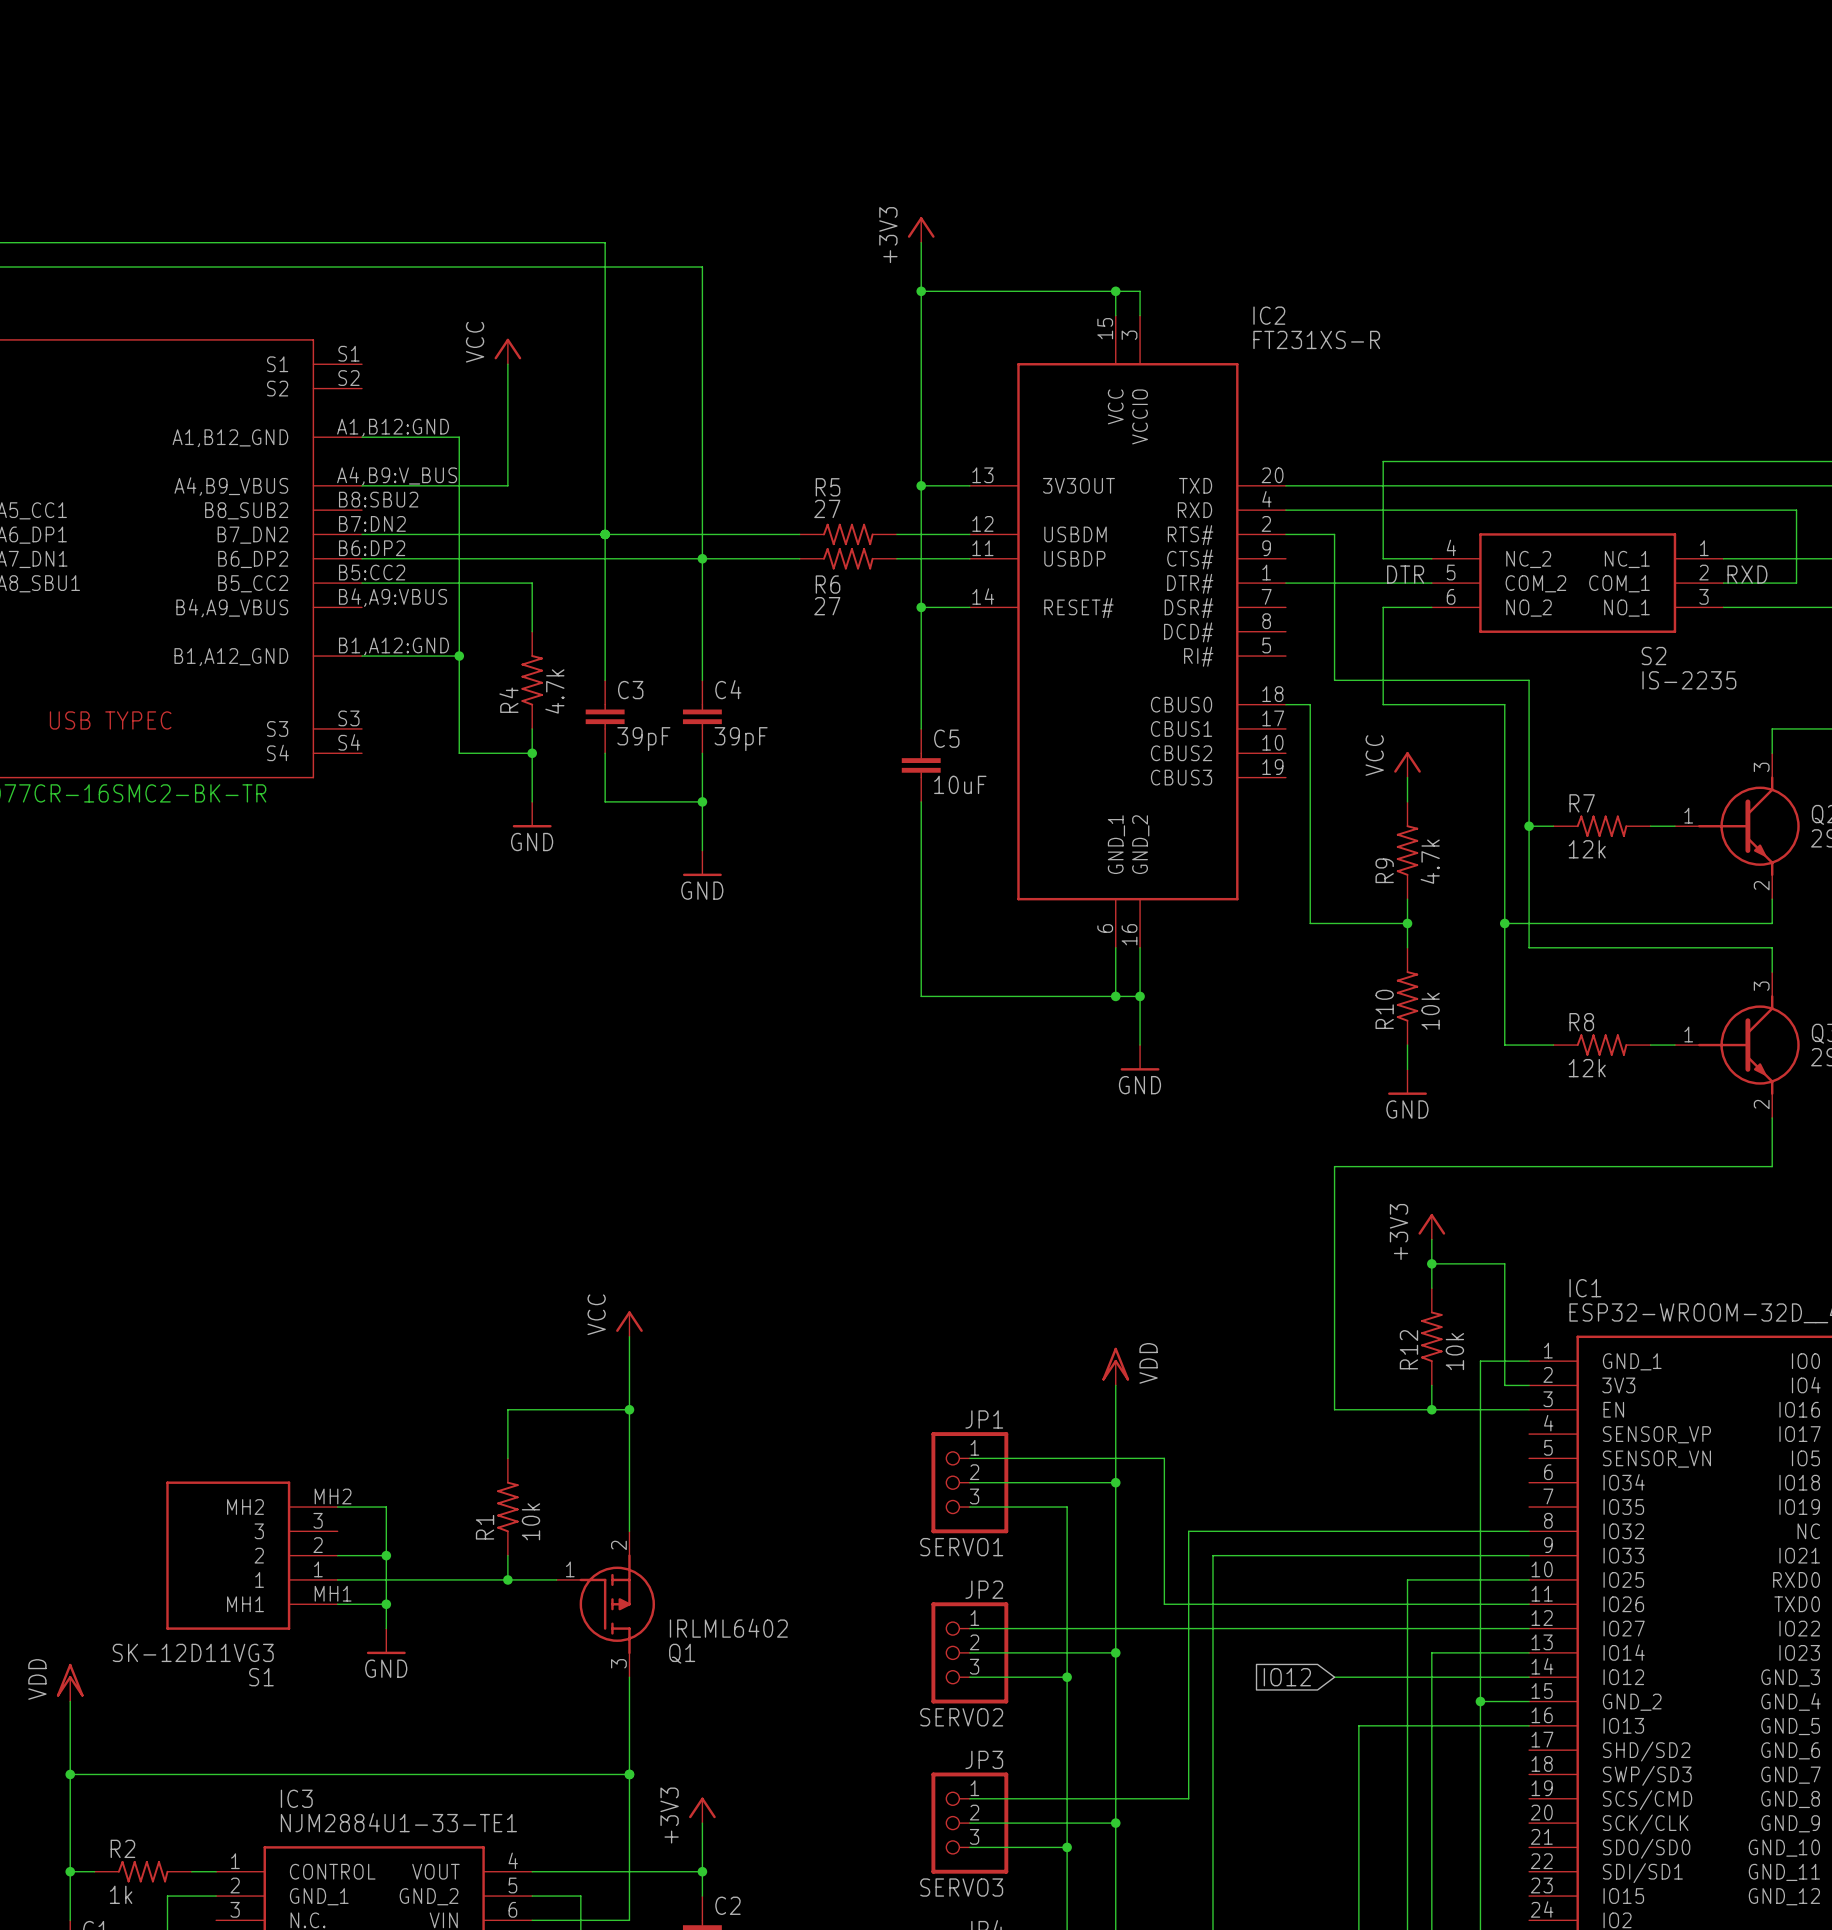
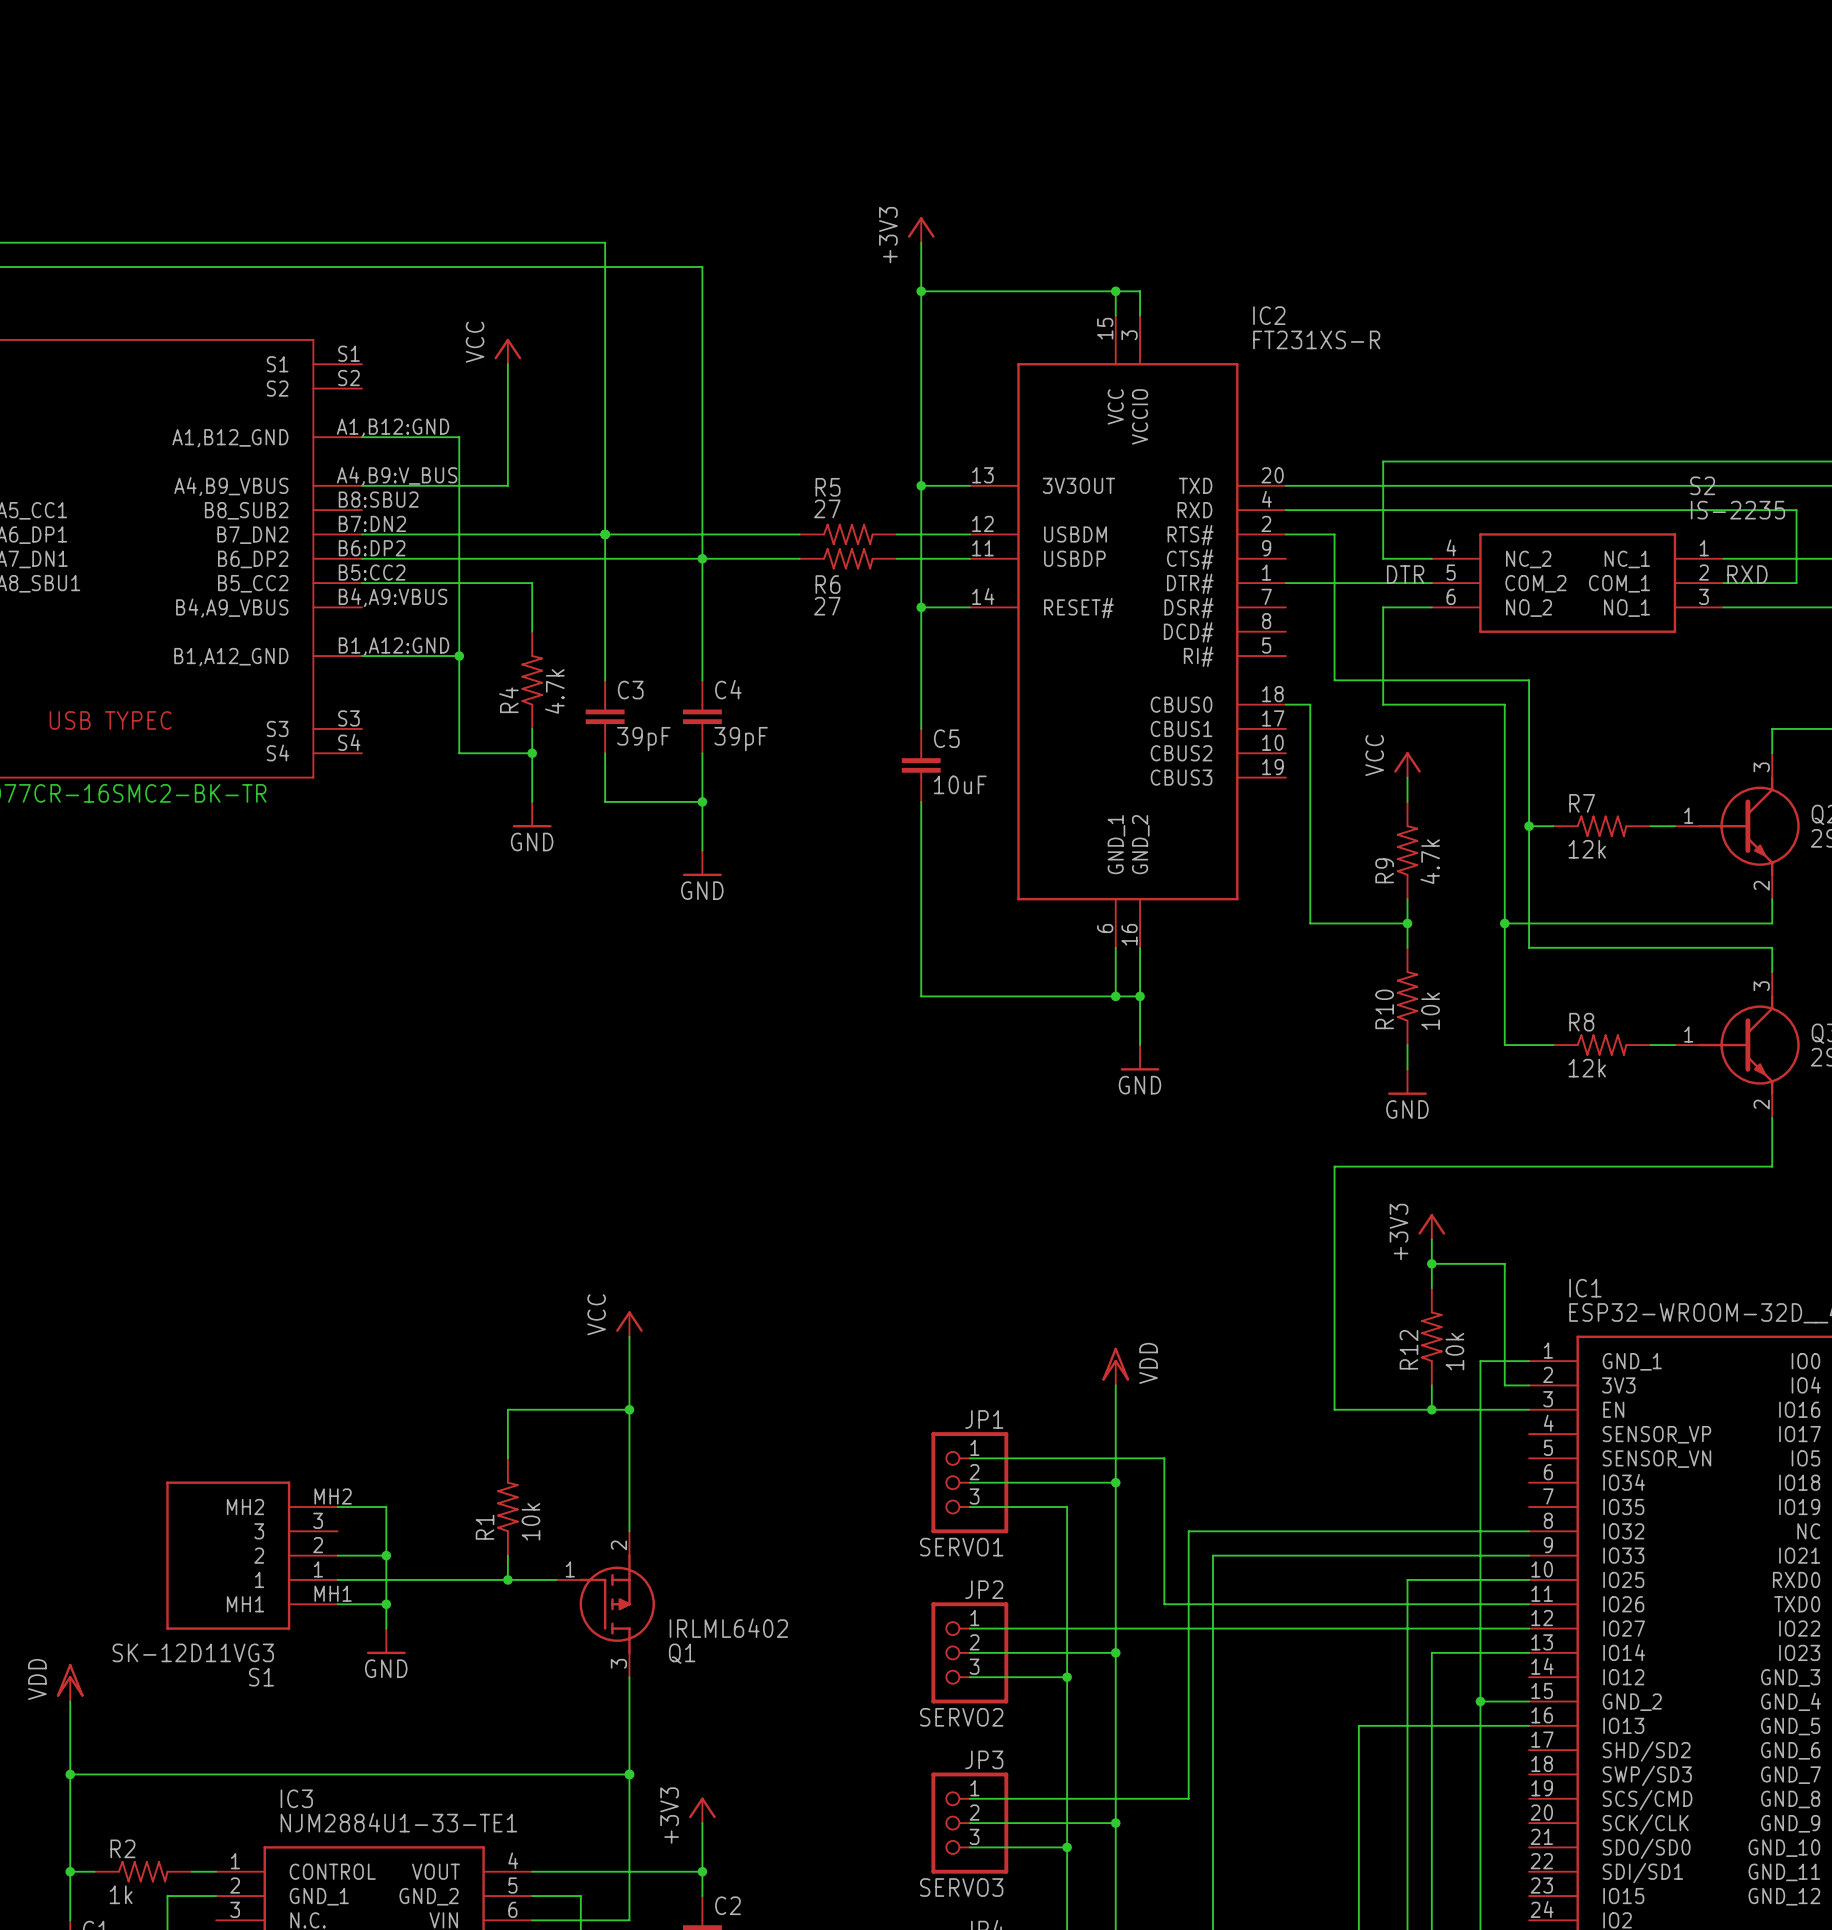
S2 name position: S2 (1653, 656) -> S2 (1702, 485)
S2 value position: IS-2235 (1689, 680) -> IS-2235 (1737, 510)
global label: IO12 (1287, 1677) -> none
wire: (1334, 1677) (1529, 1677) -> none

